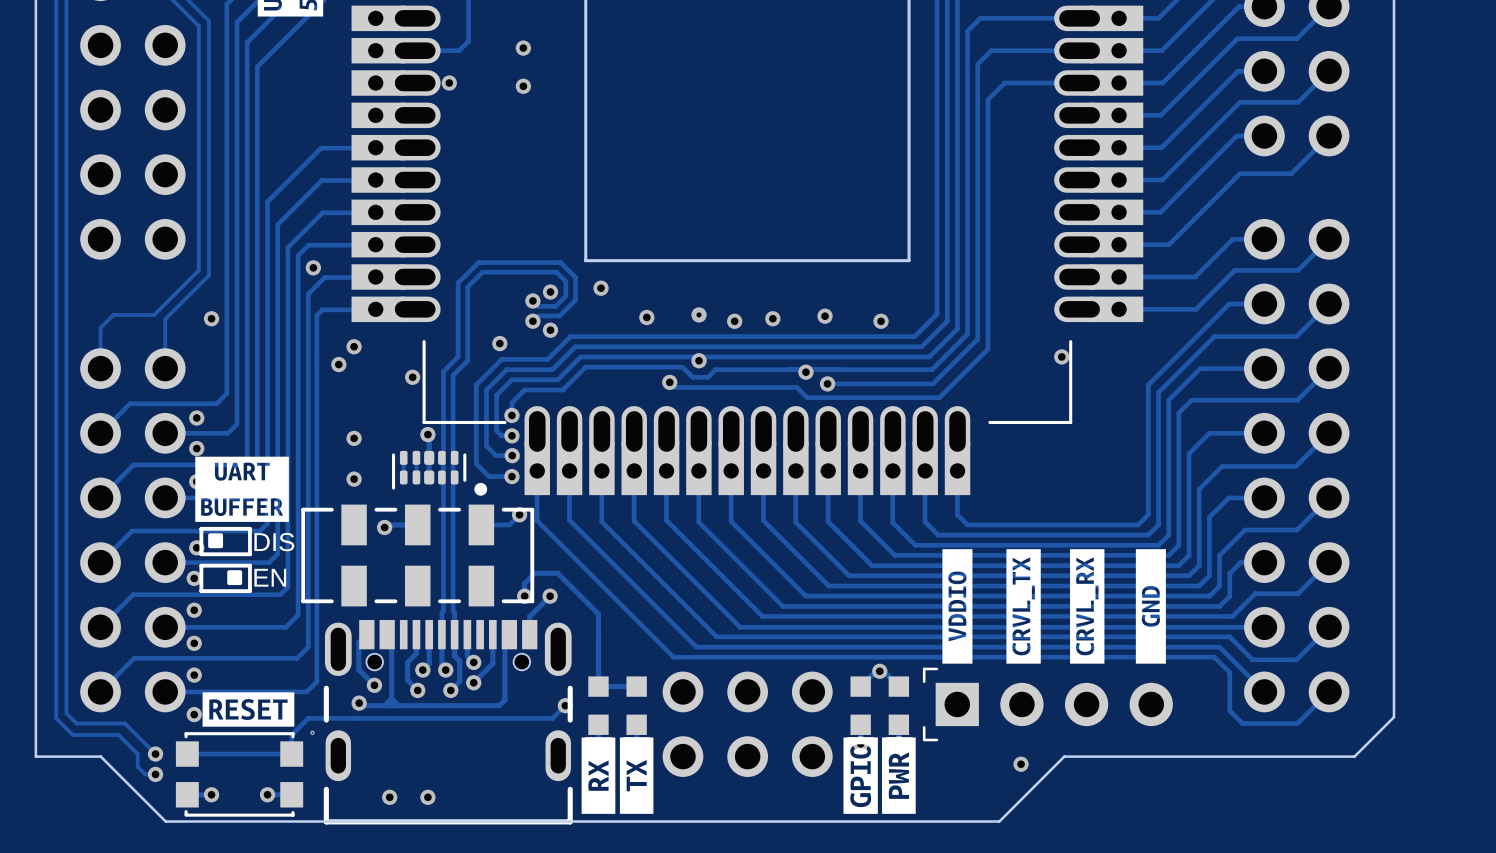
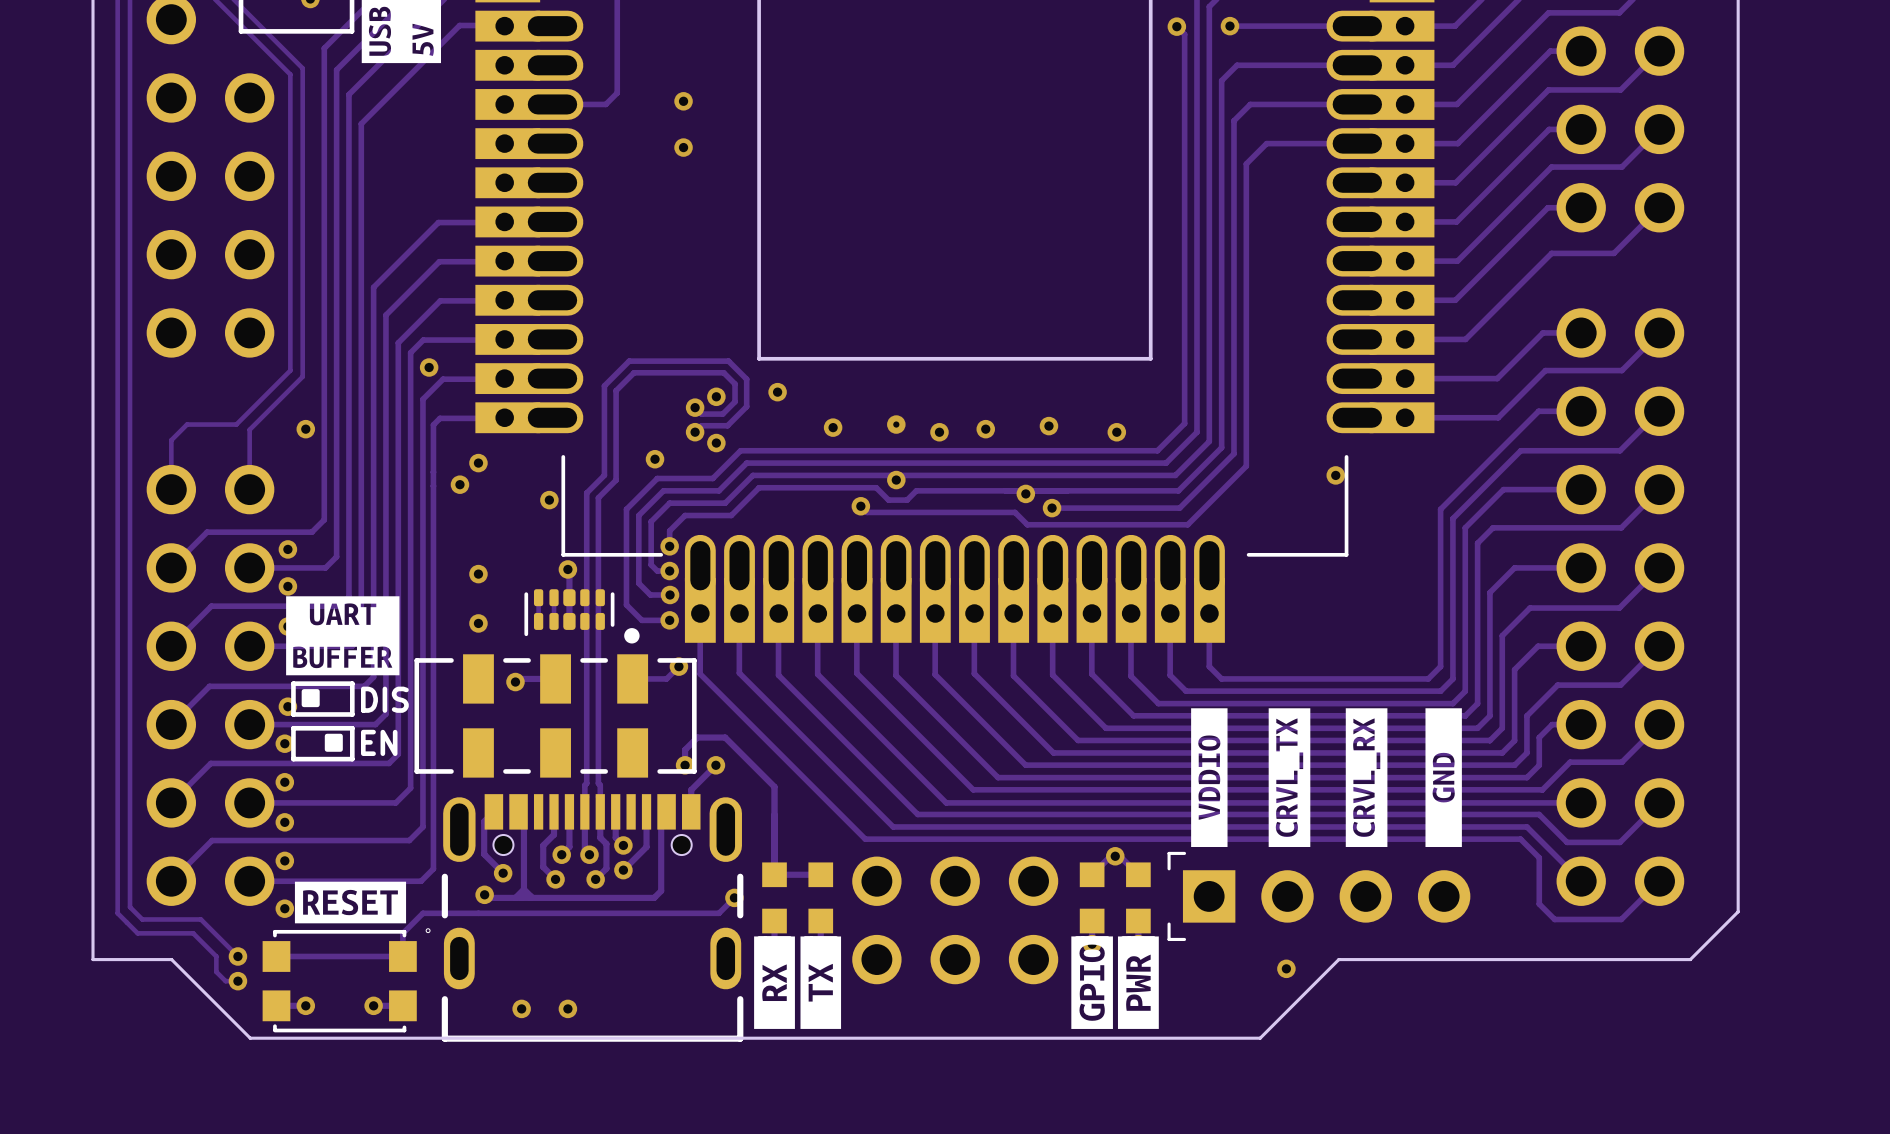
via: (449, 83) -> none

